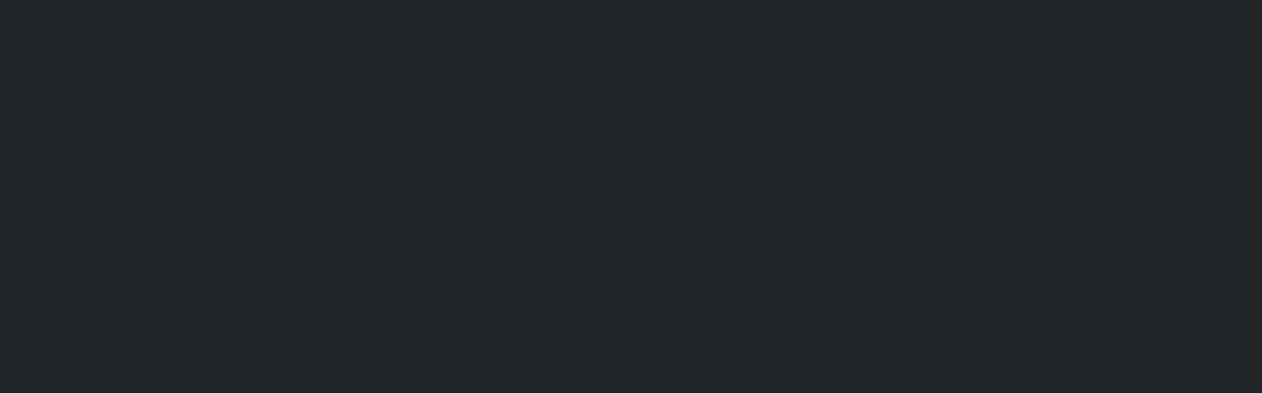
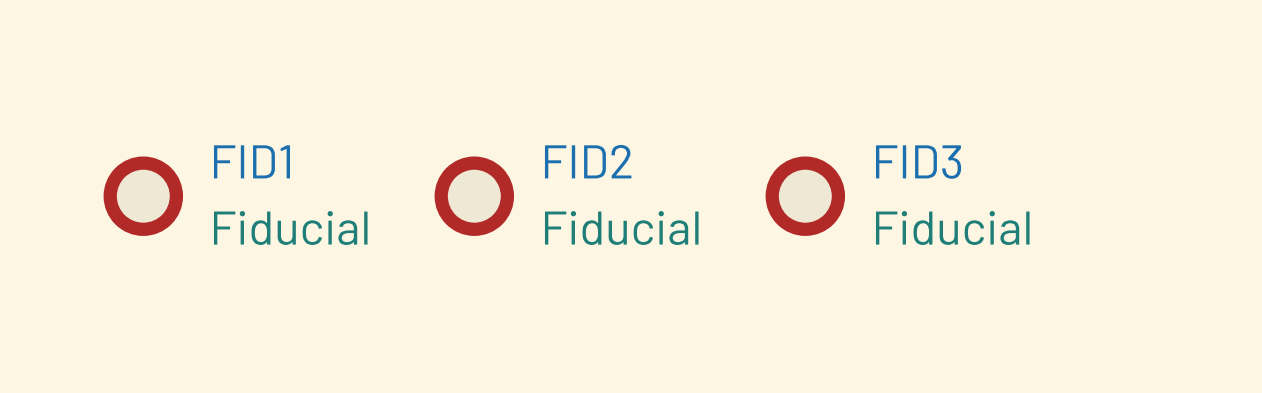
FID1: none -> Fiducial (143, 196)
FID2: none -> Fiducial (474, 196)
FID3: none -> Fiducial (805, 196)

